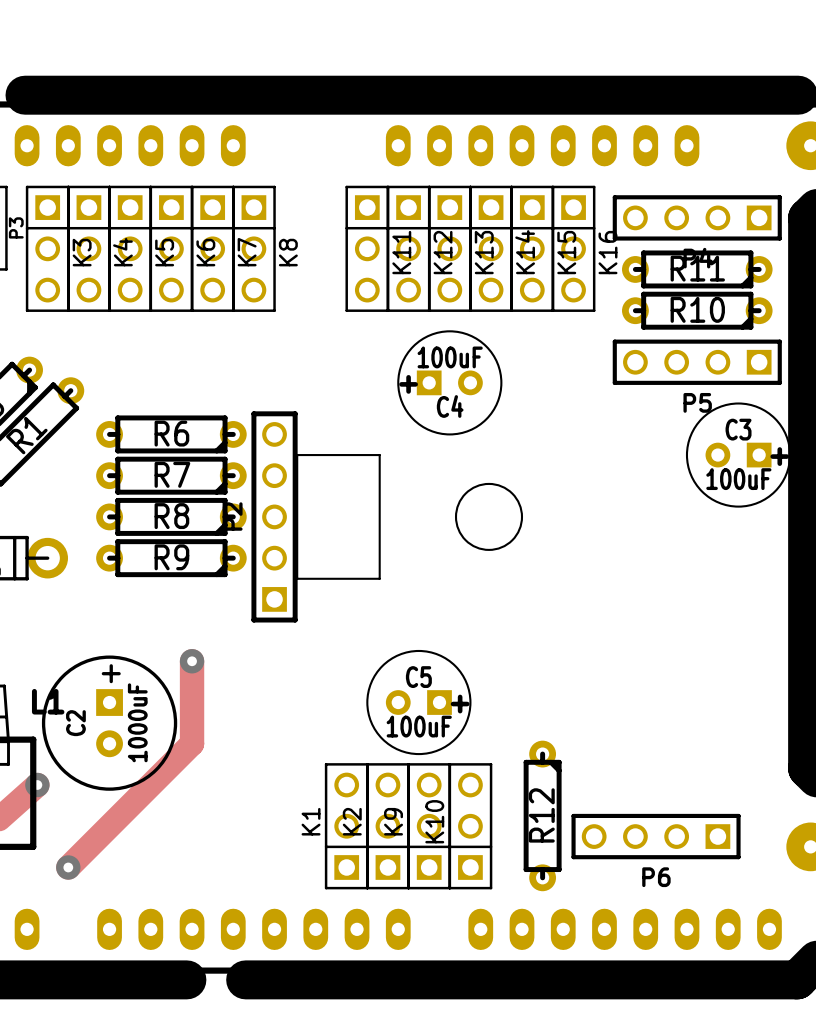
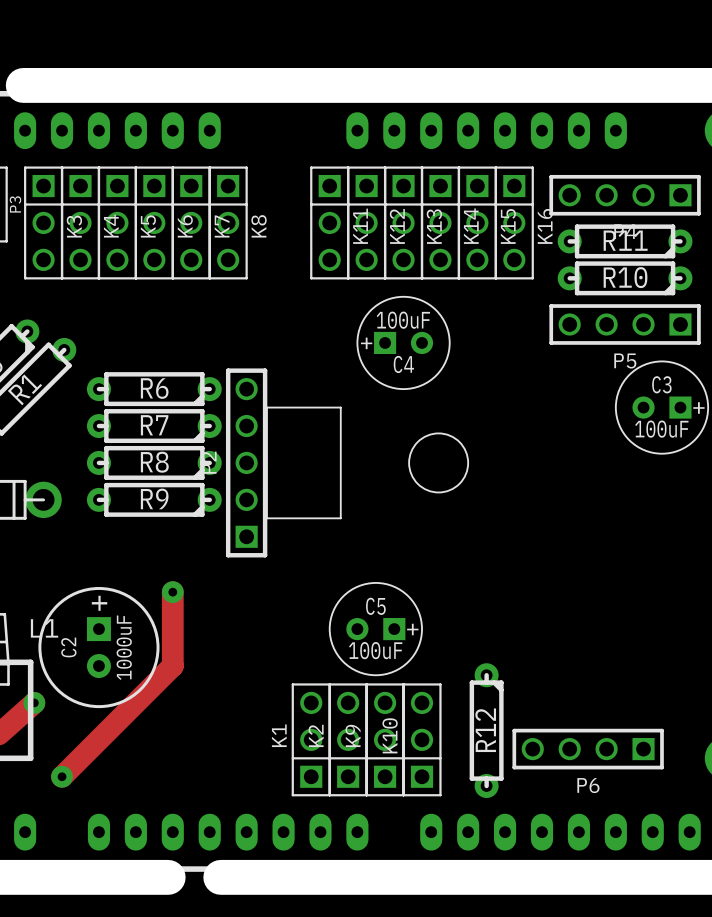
C2 footprint: [41, 655, 178, 791] -> [38, 587, 160, 709]

